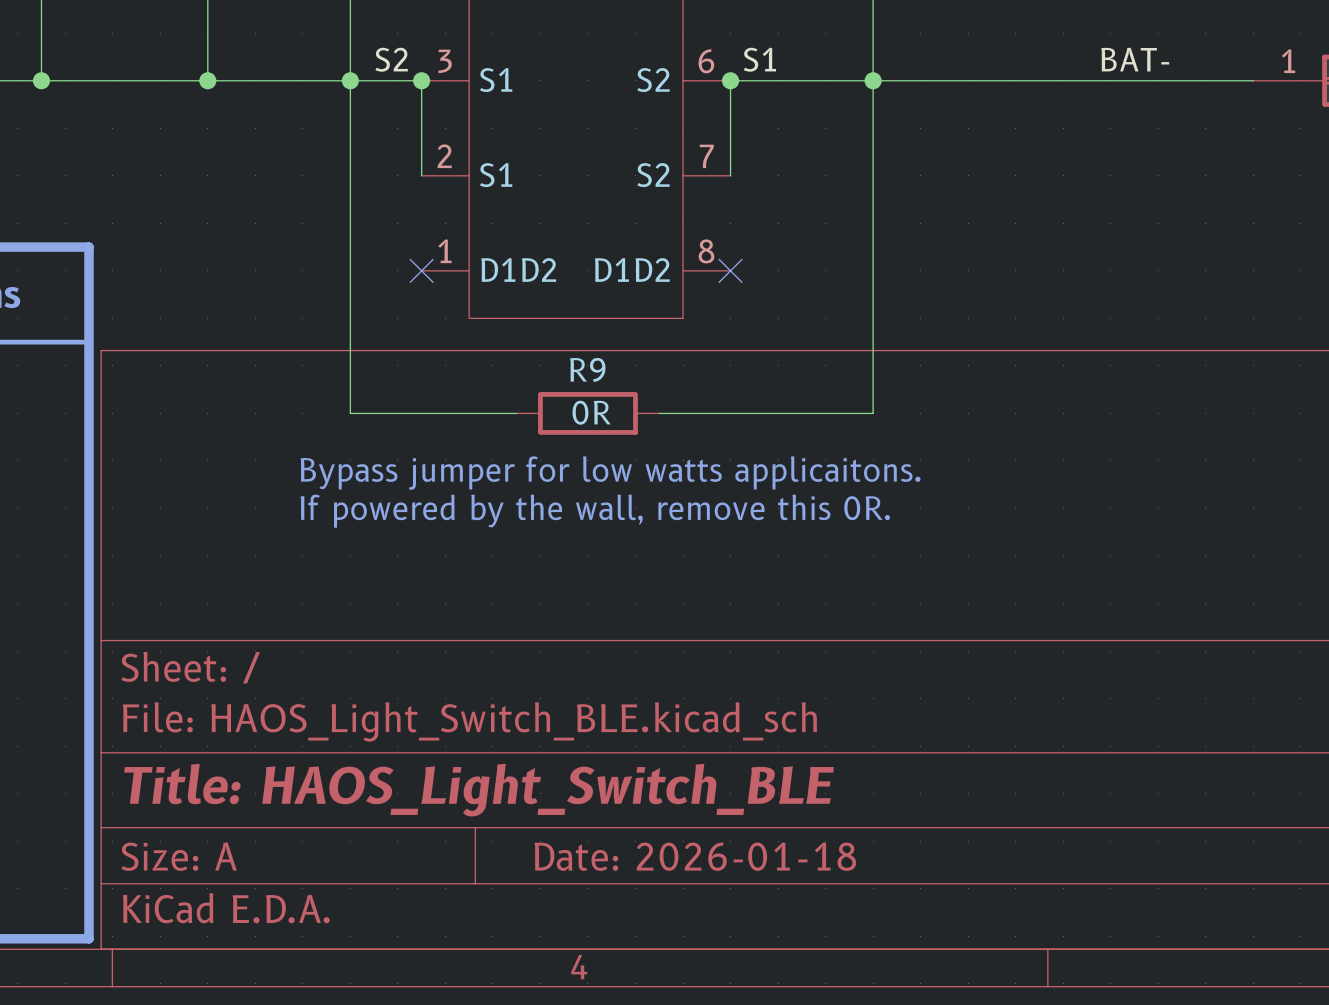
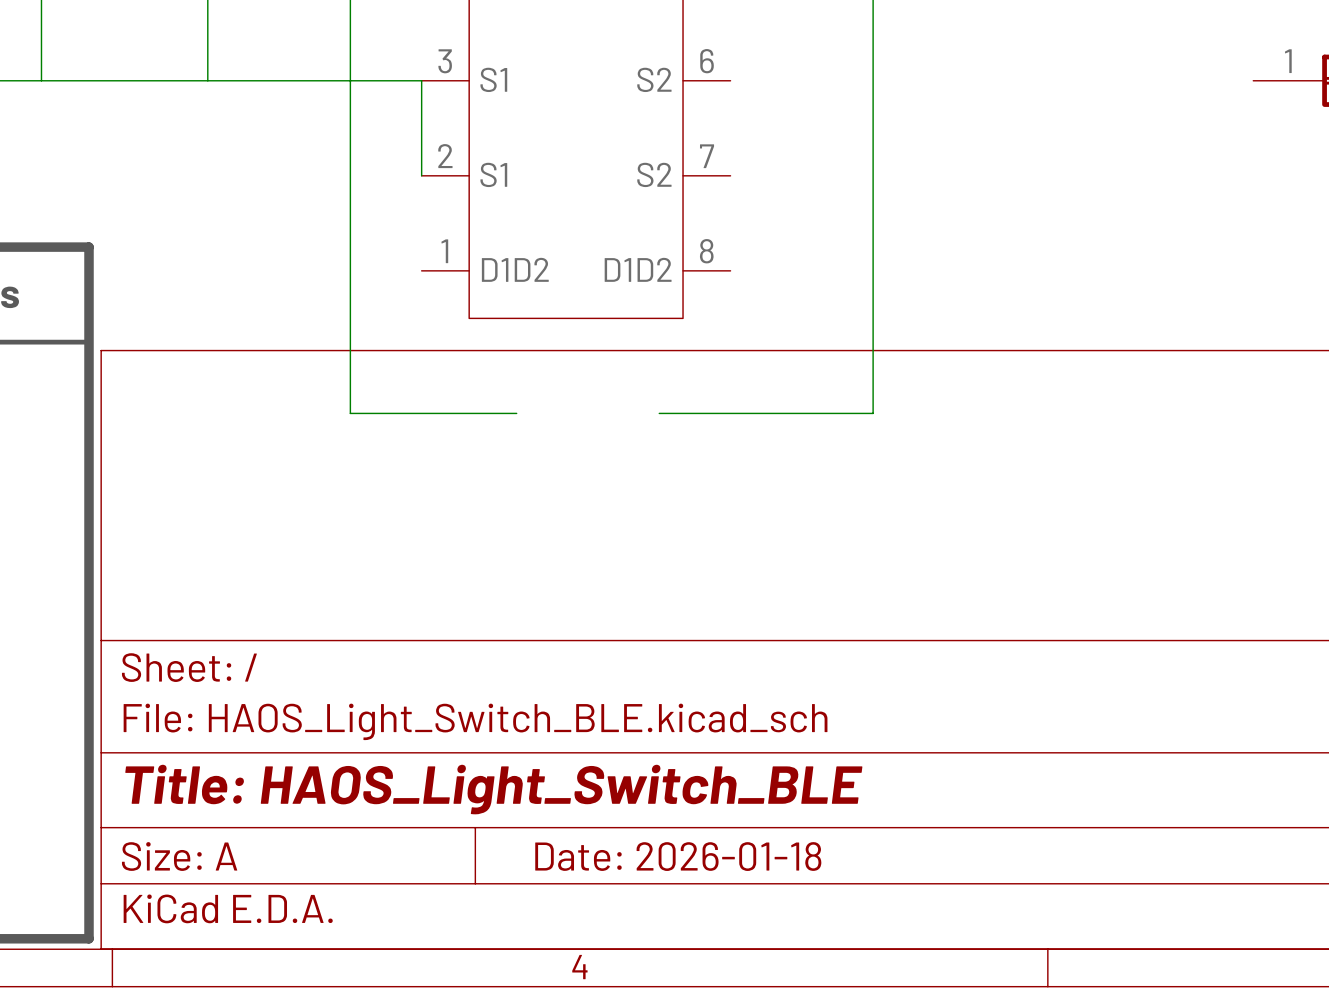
label: S2 (391, 59) -> none
label: S1 (759, 59) -> none
label: BAT- (1135, 59) -> none
junction: (41, 80) -> none
junction: (207, 80) -> none
junction: (350, 80) -> none
junction: (421, 80) -> none
junction: (730, 80) -> none
junction: (873, 80) -> none
wire: (1253, 80) (730, 80) (730, 175) -> none
no-connect mark: (421, 270) -> none
no-connect mark: (730, 270) -> none
R9: 0R (587, 413) -> none
text: Bypass jumper for low watts applicaitons. (610, 473) -> none
text: If powered by the wall, remove this 0R. (595, 511) -> none

